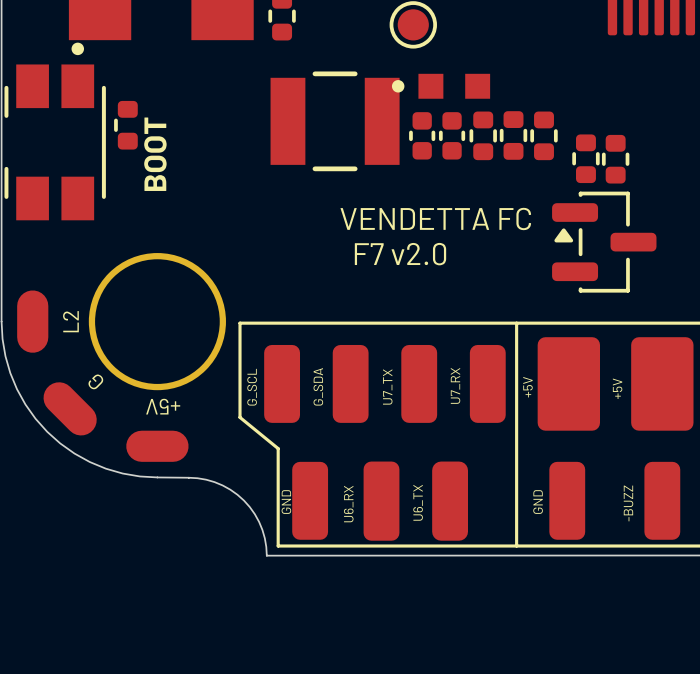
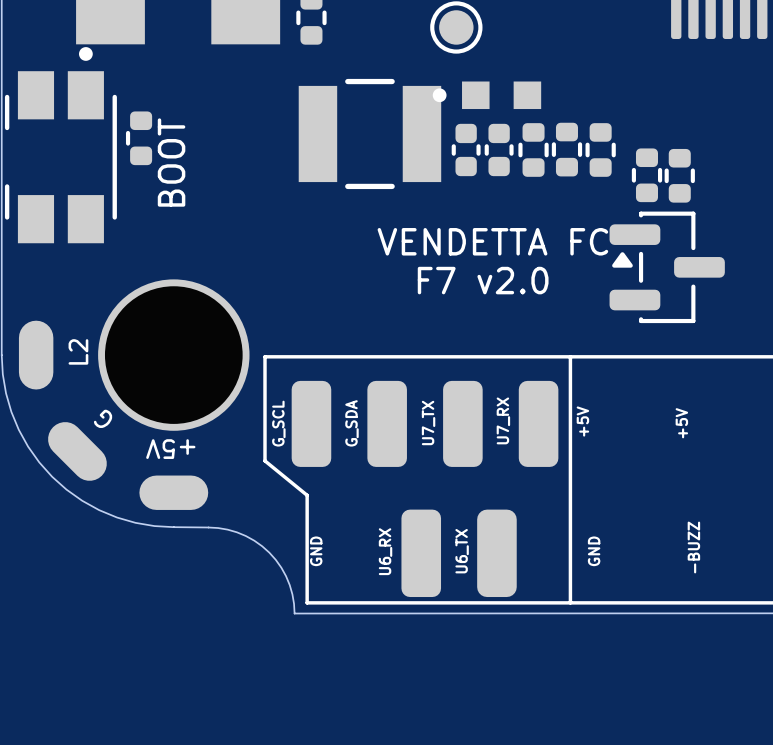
part: (568, 383) -> none
part: (662, 383) -> none
part: (310, 500) -> none
part: (567, 500) -> none
part: (662, 500) -> none

